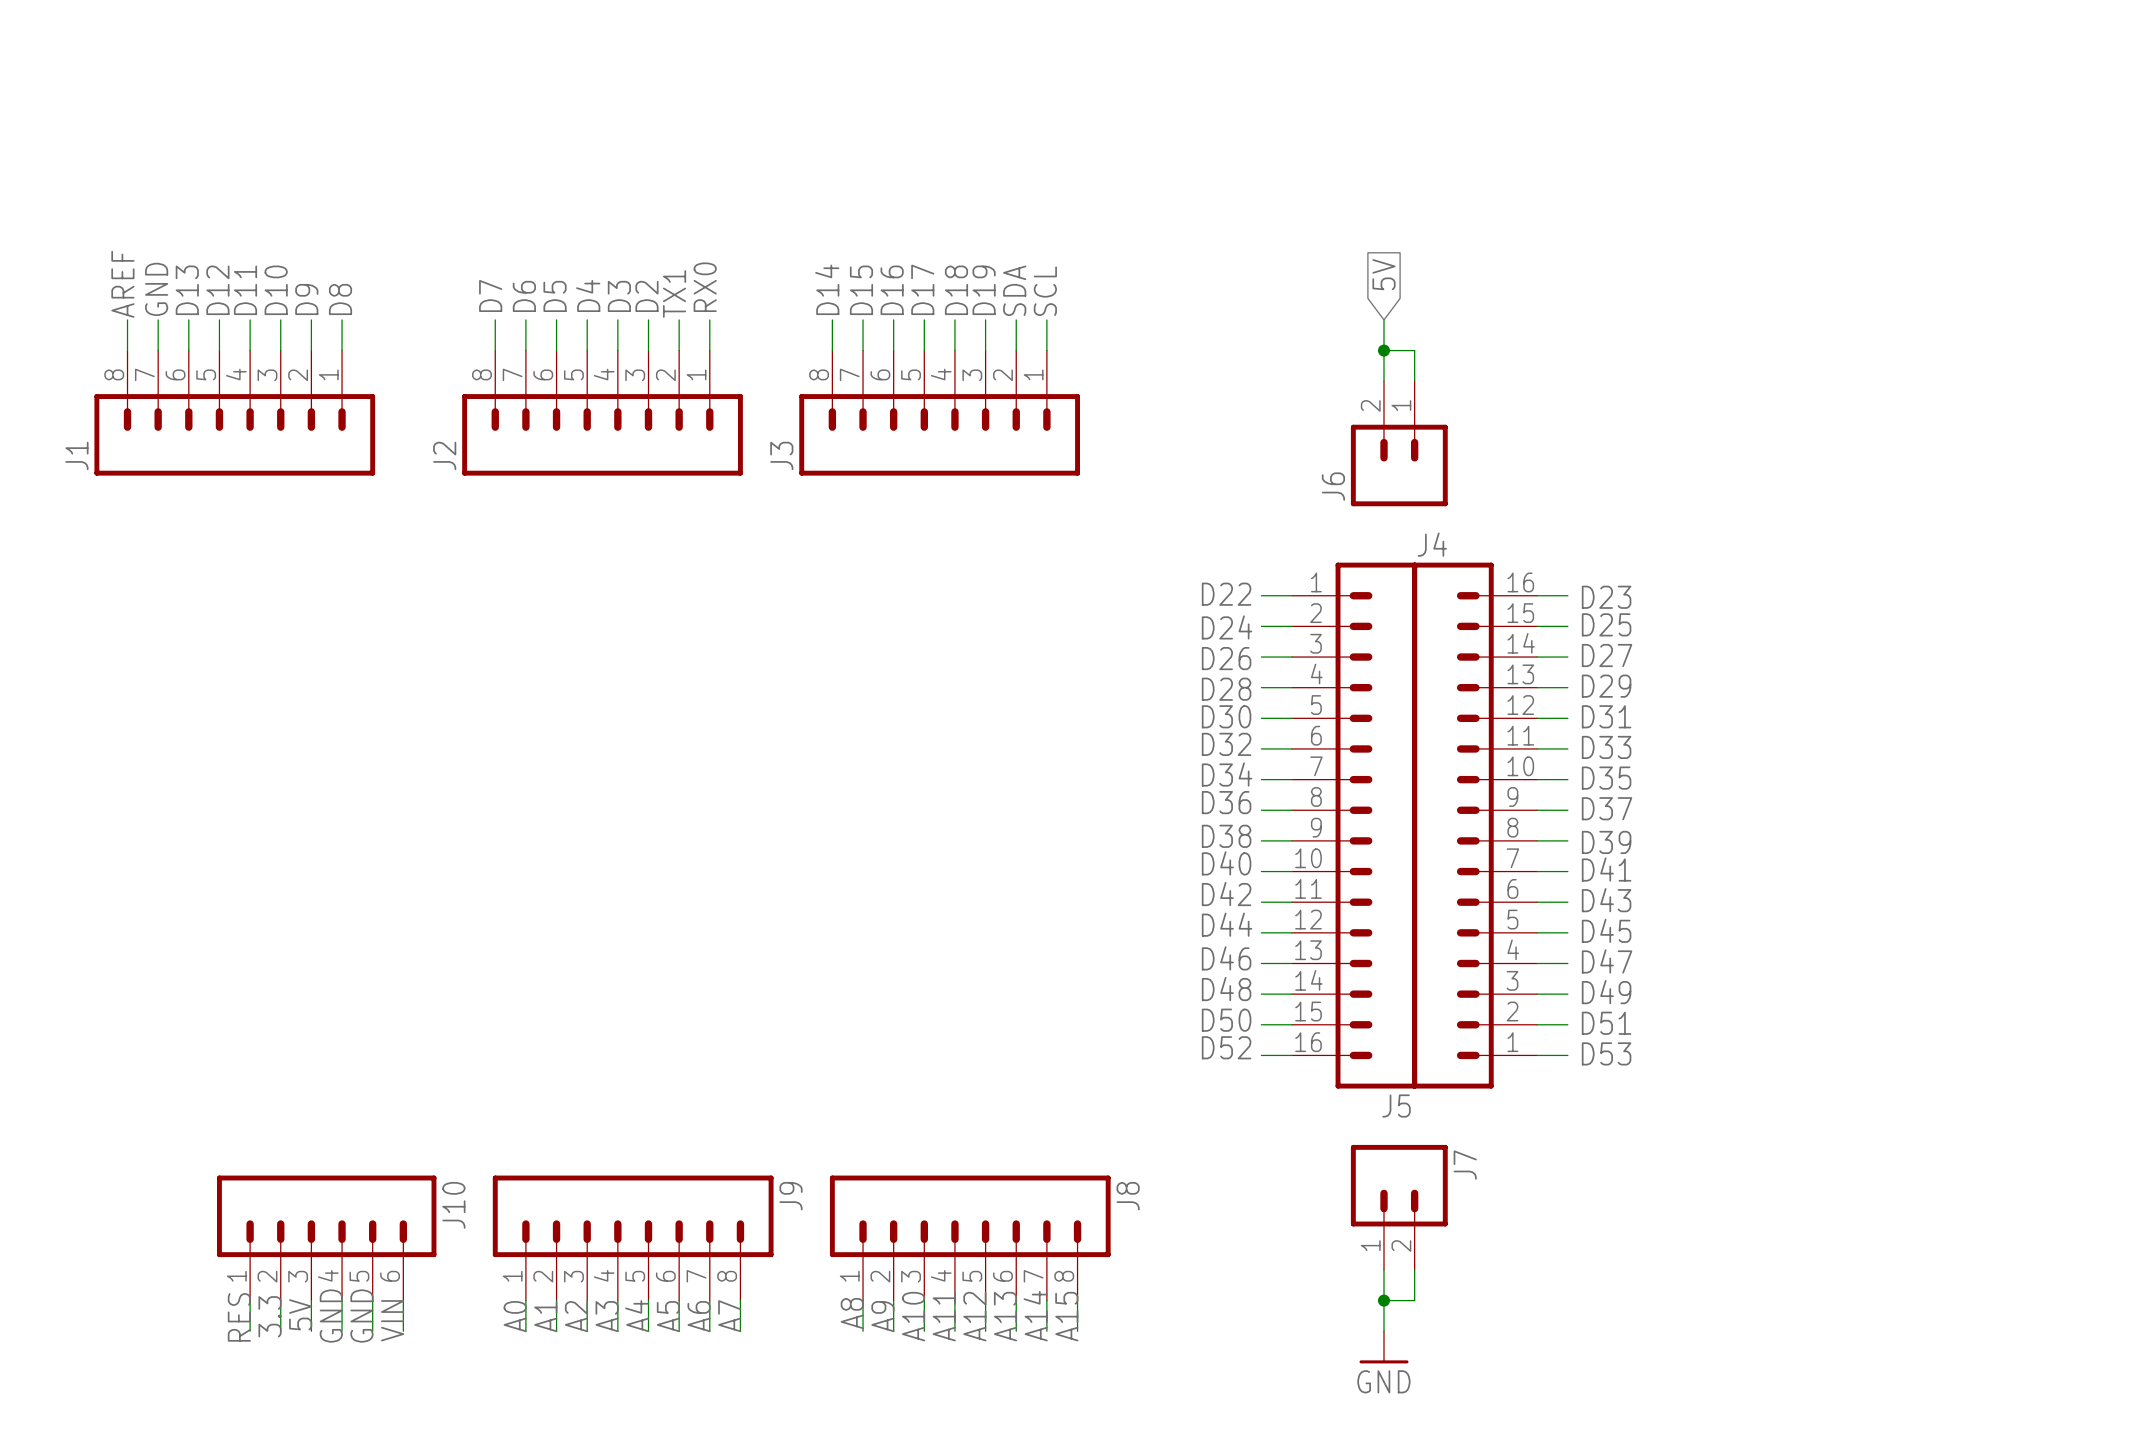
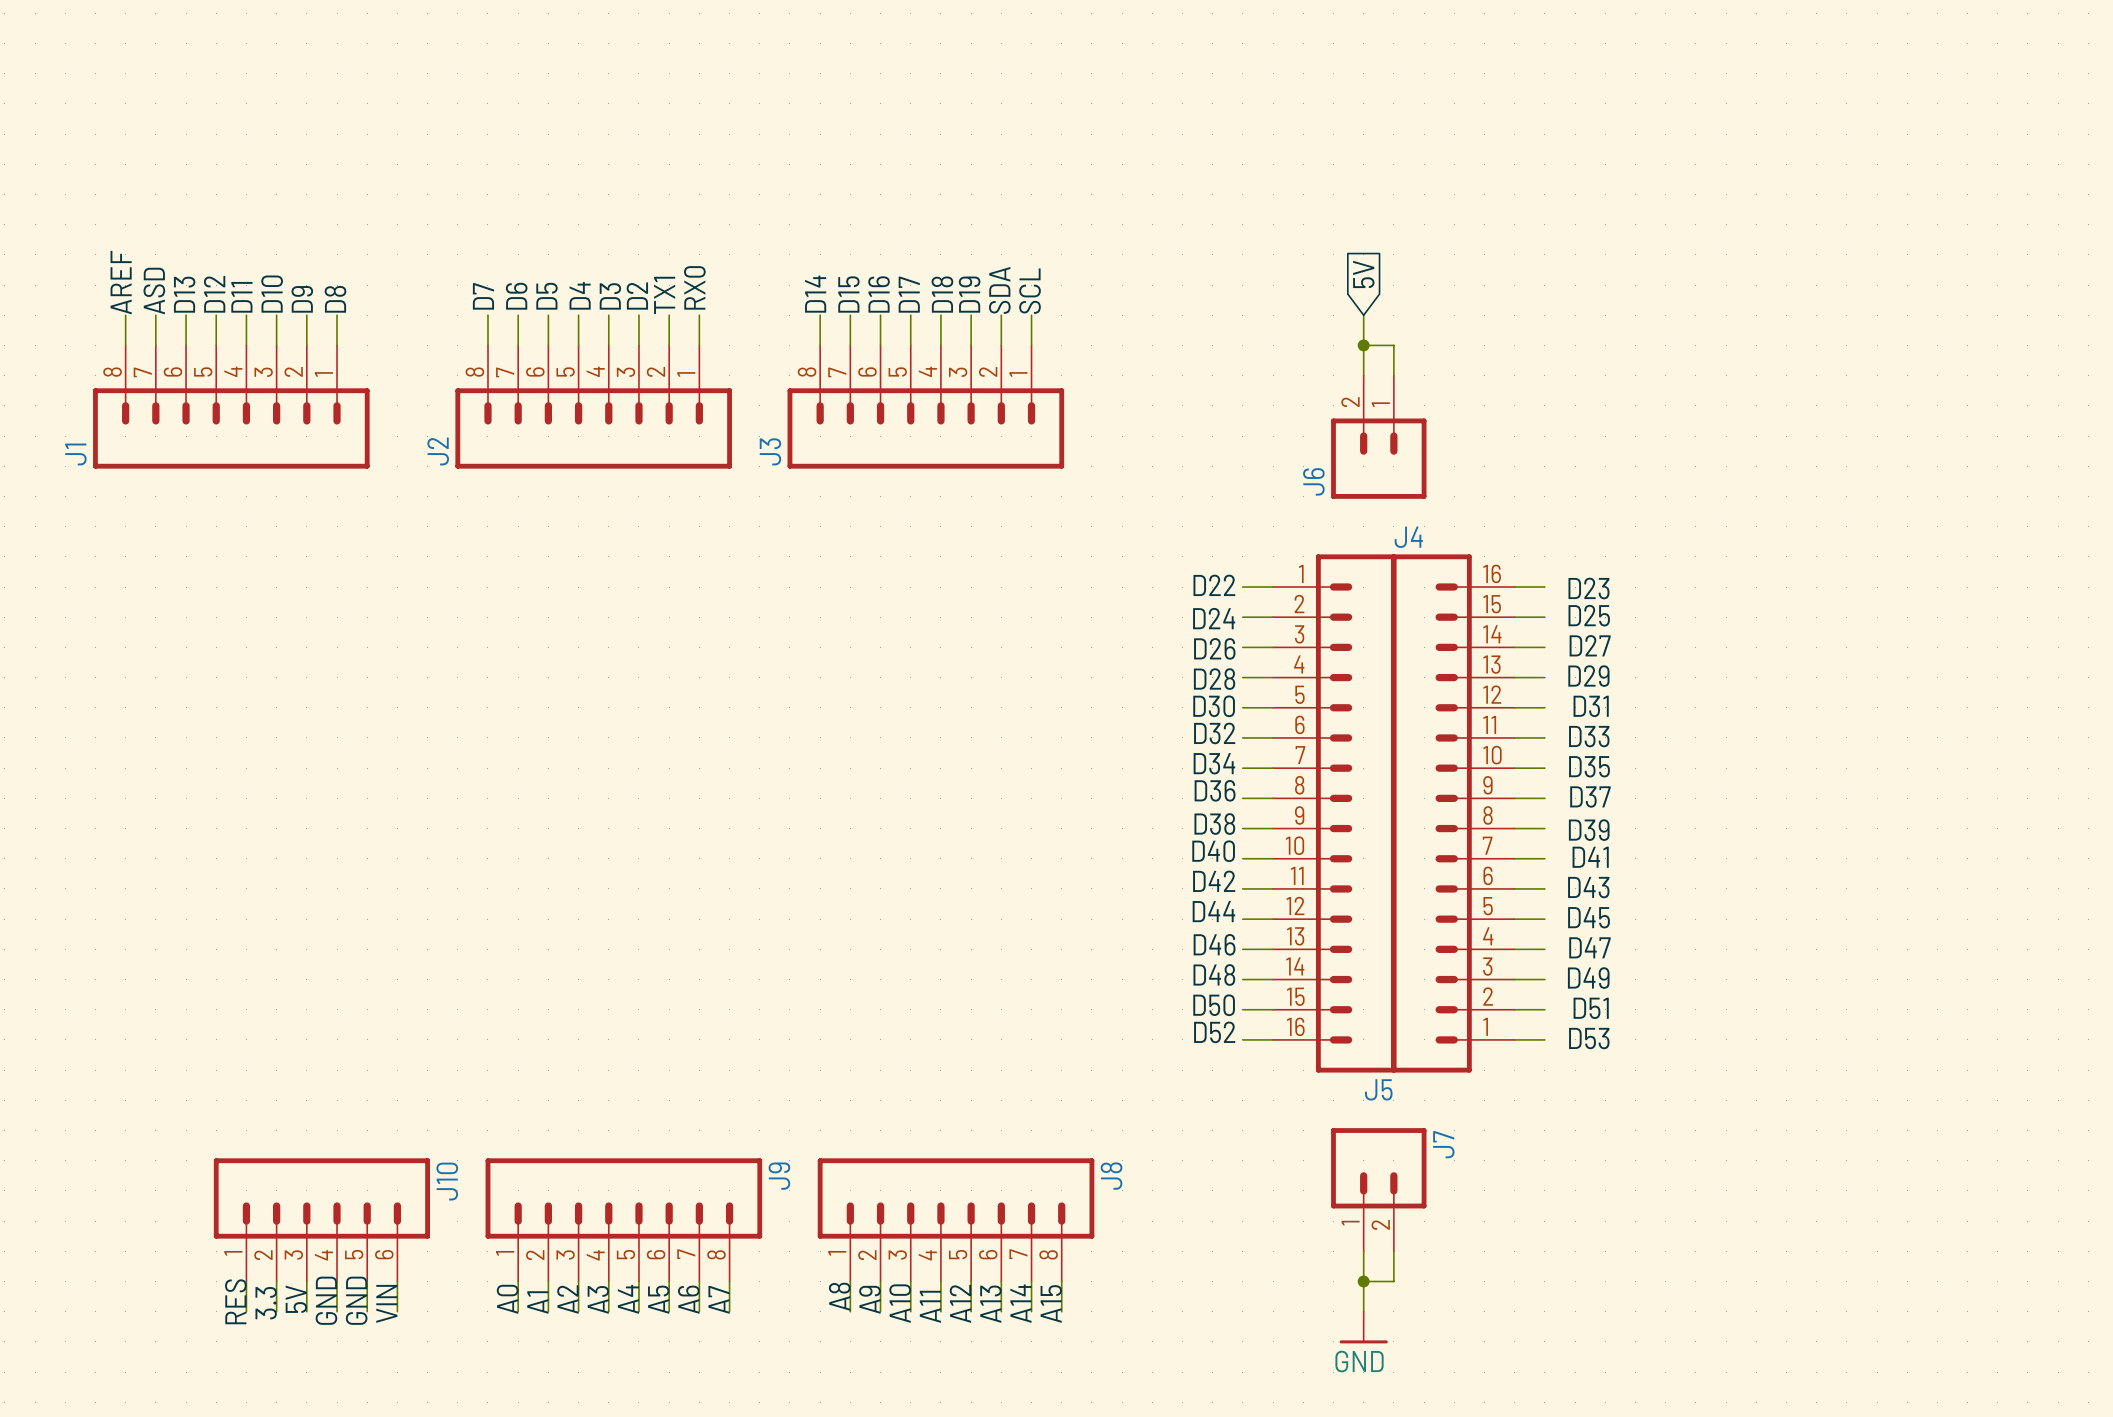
label: GND (156, 289) -> ASD (154, 291)

